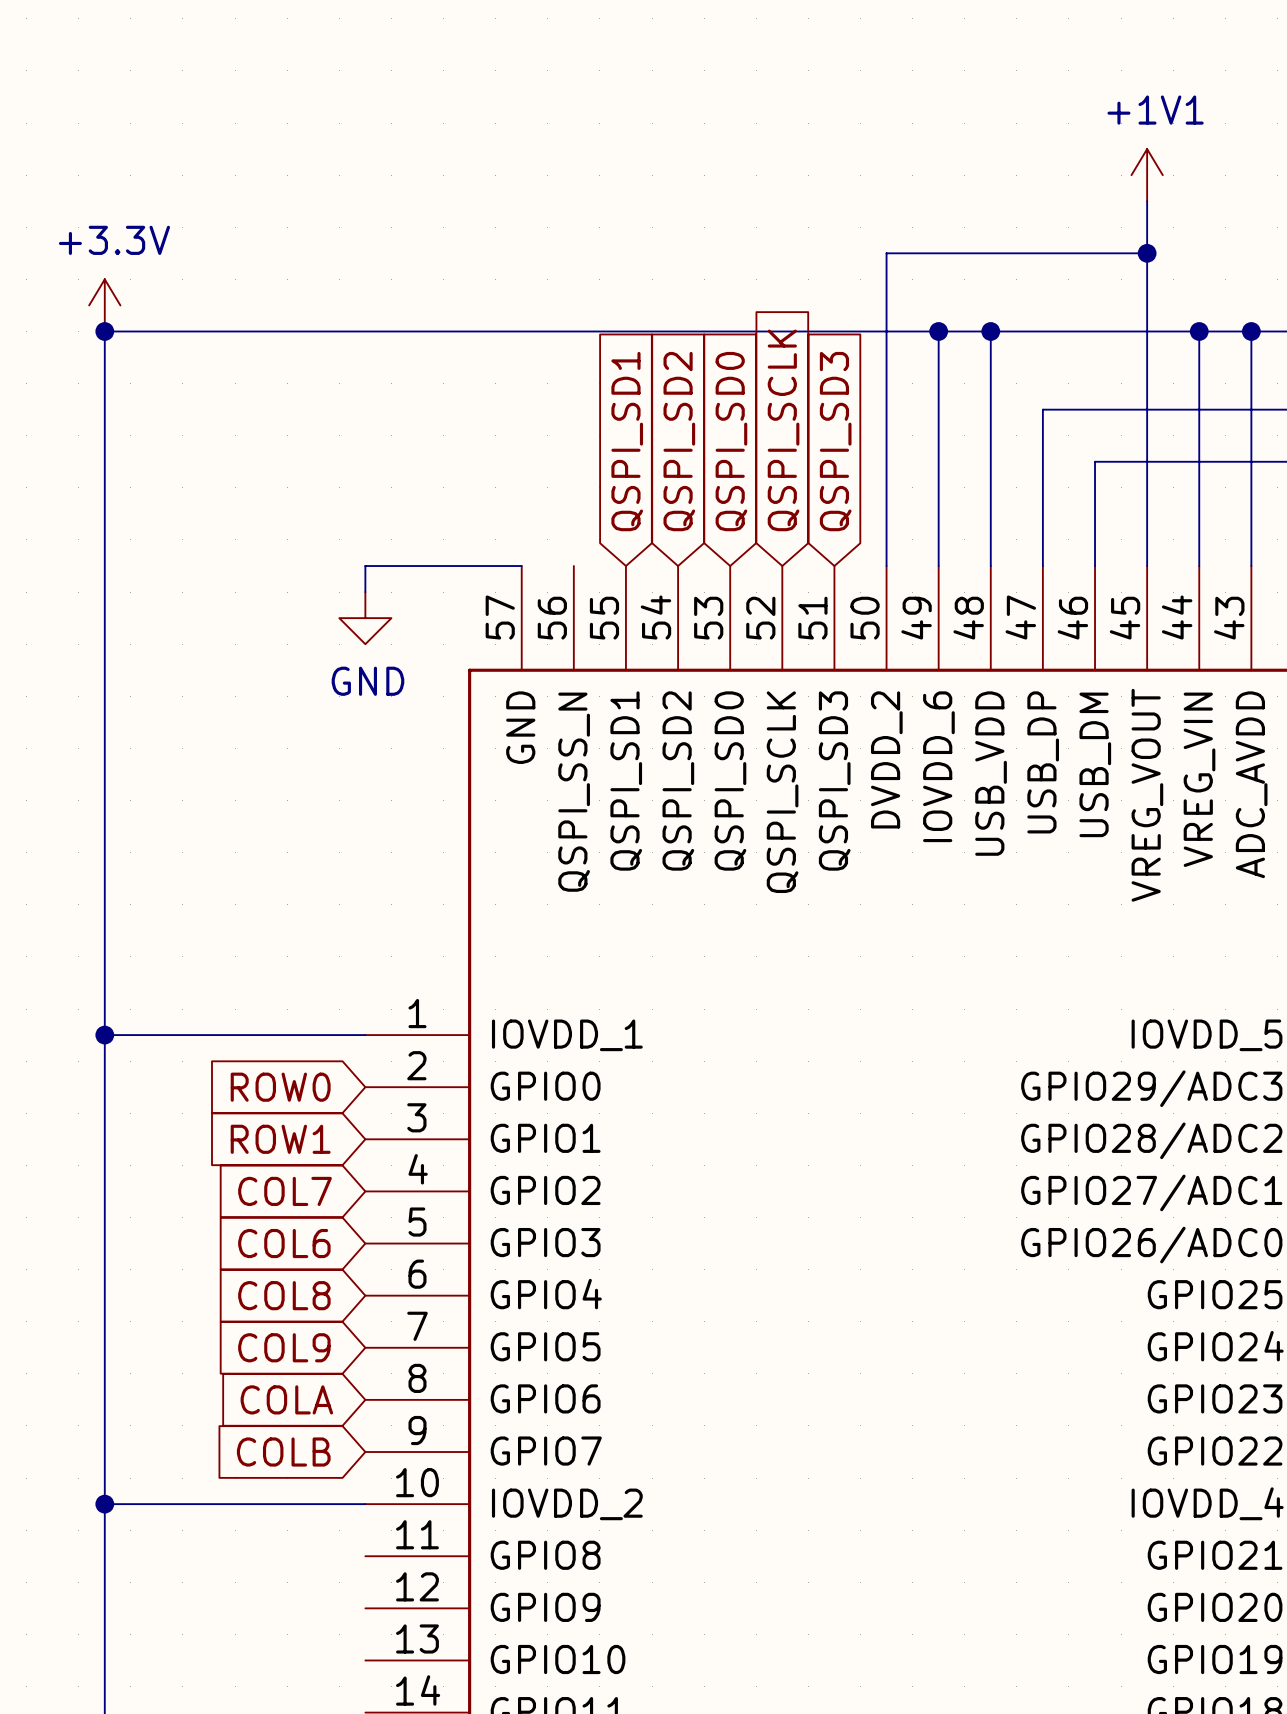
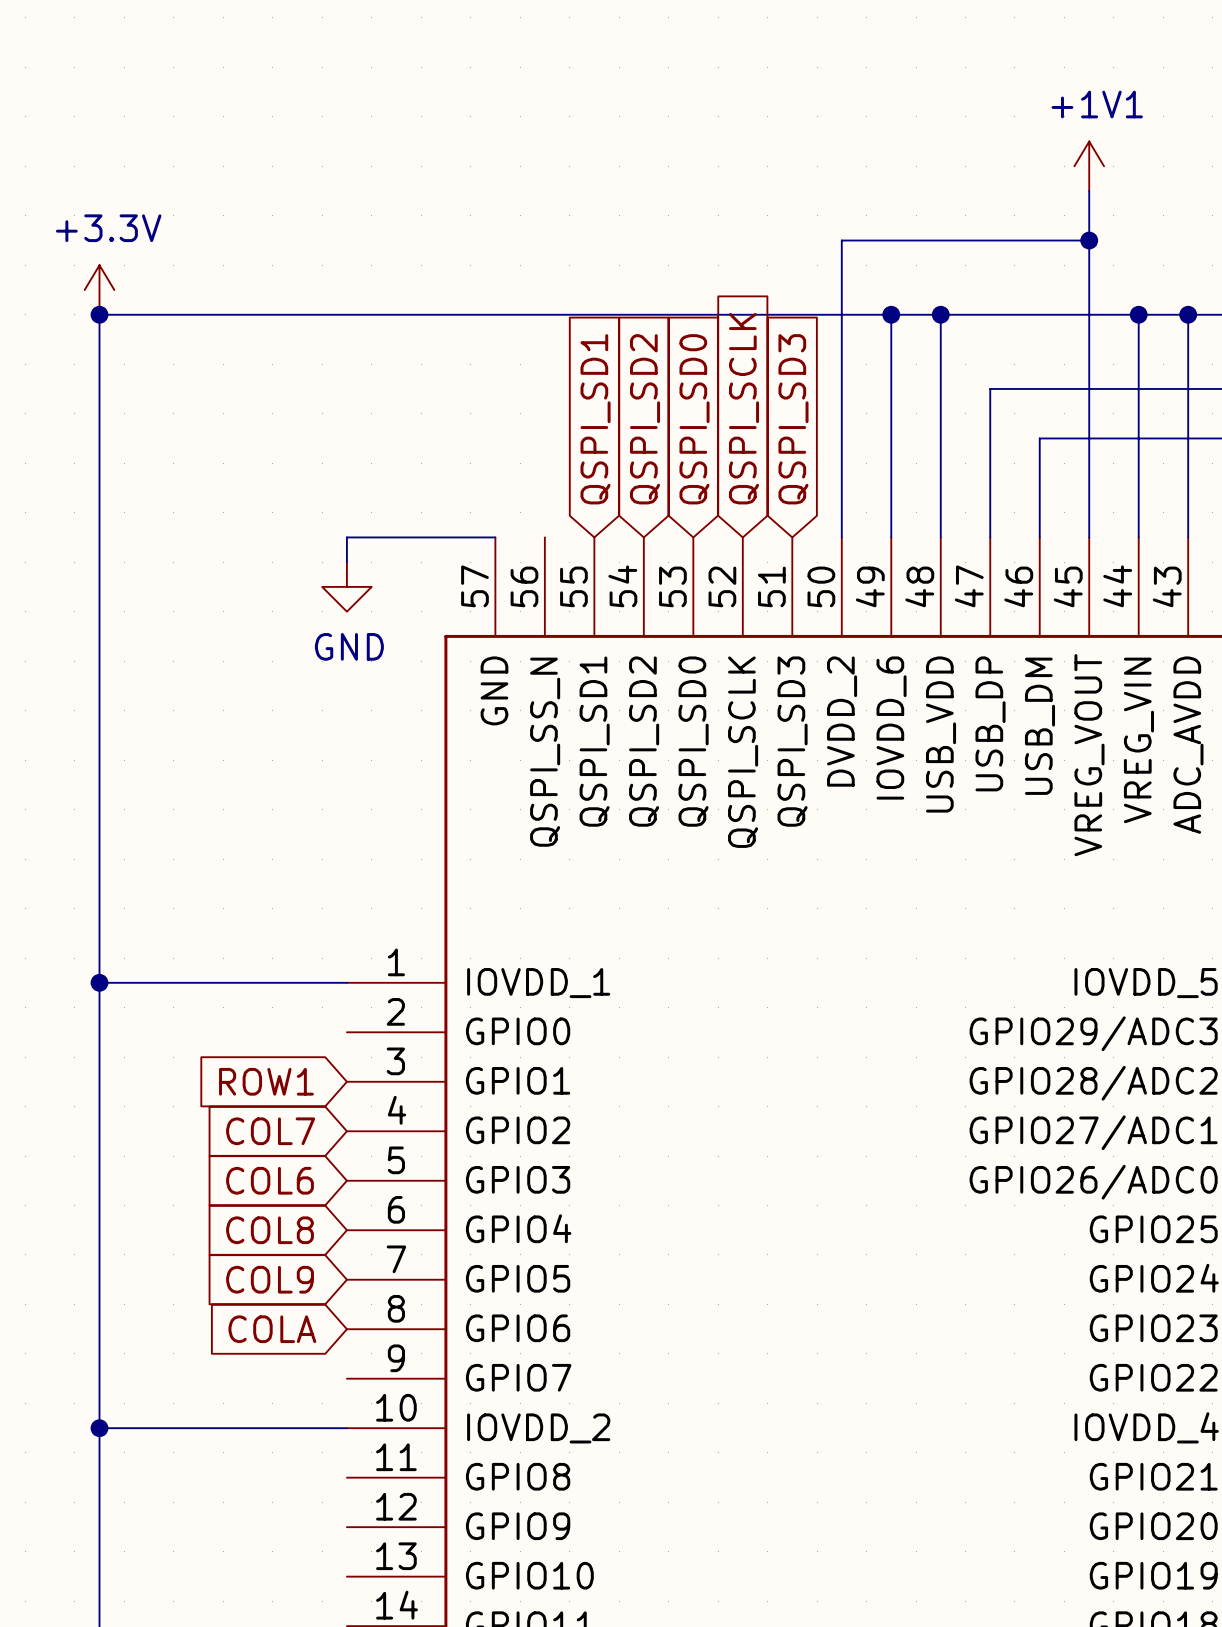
global label: ROW0 (280, 1087) -> none
global label: COLB (283, 1452) -> none

